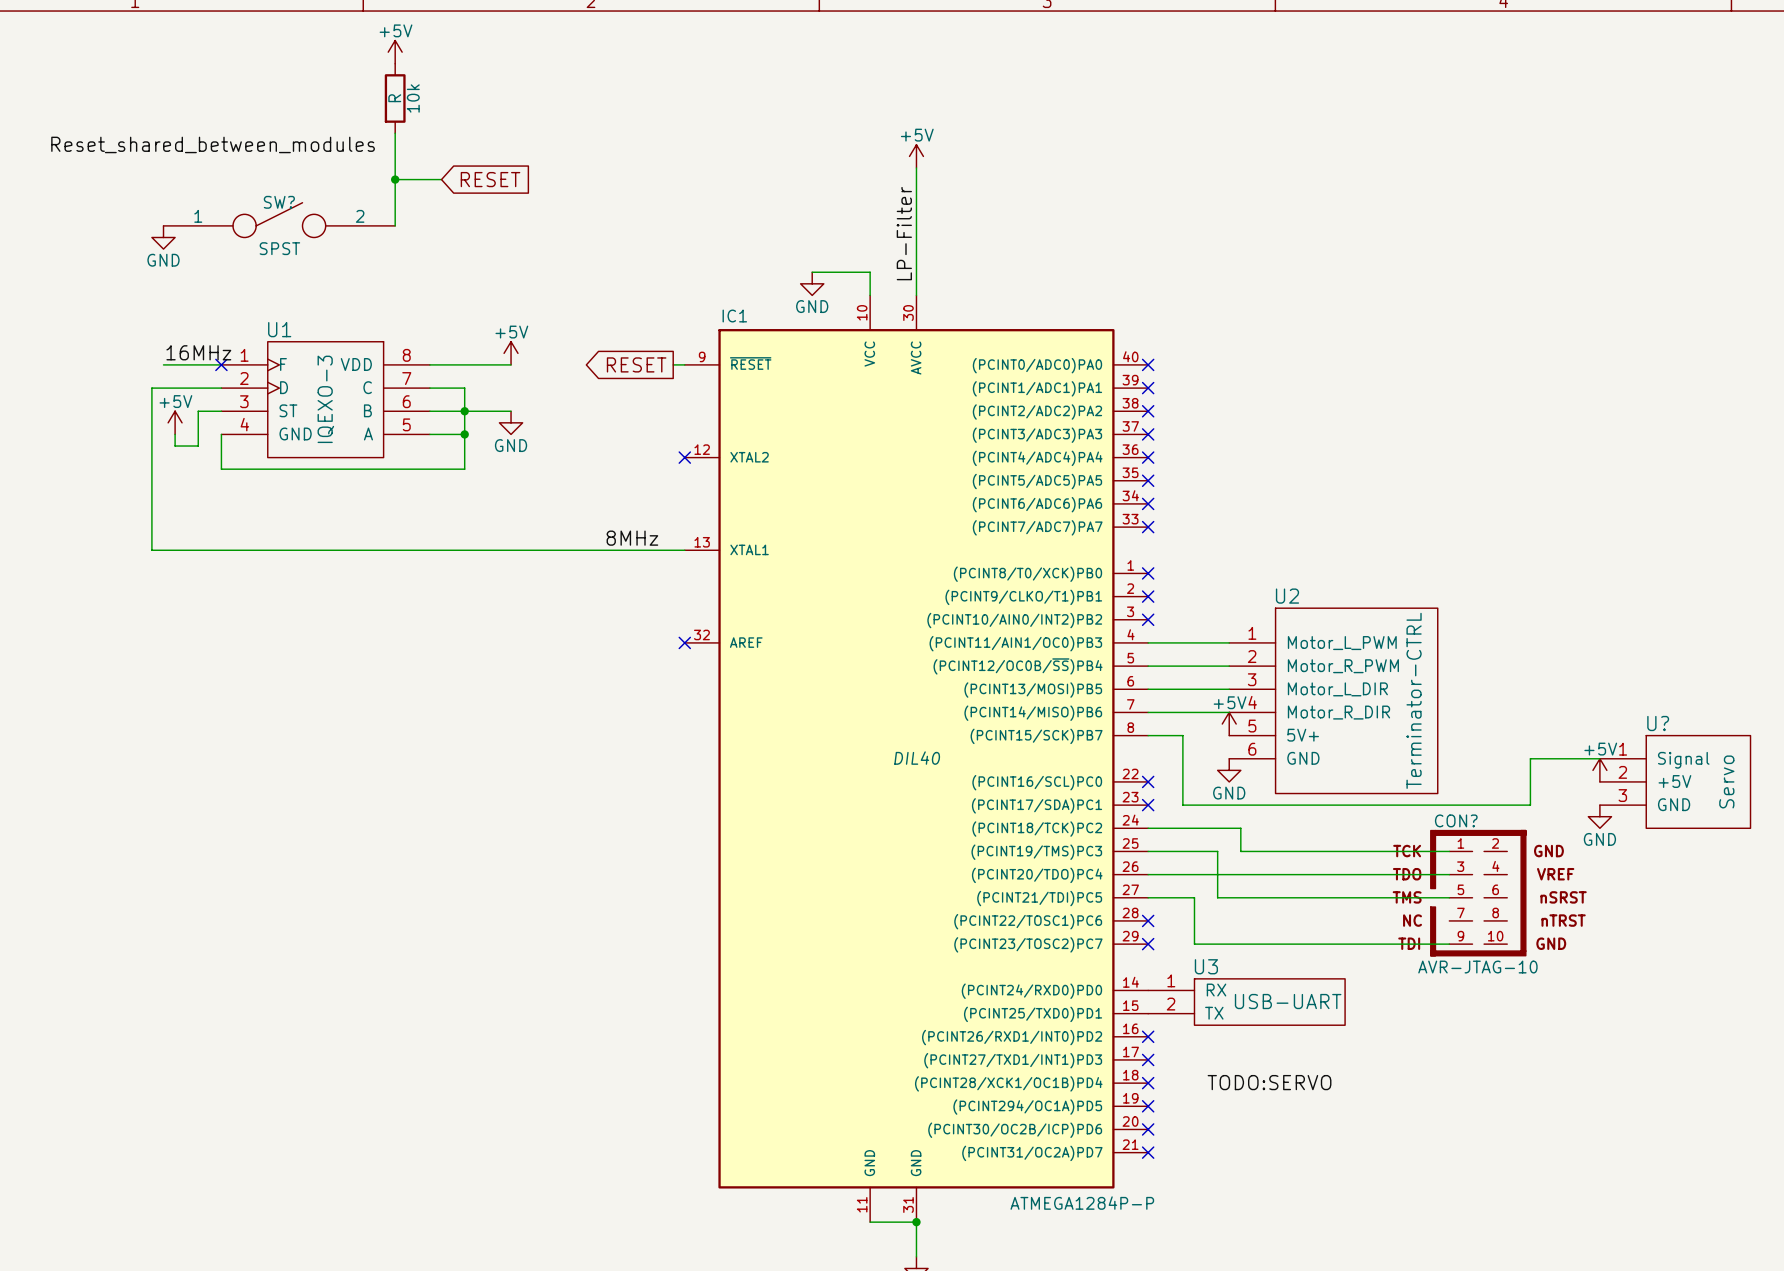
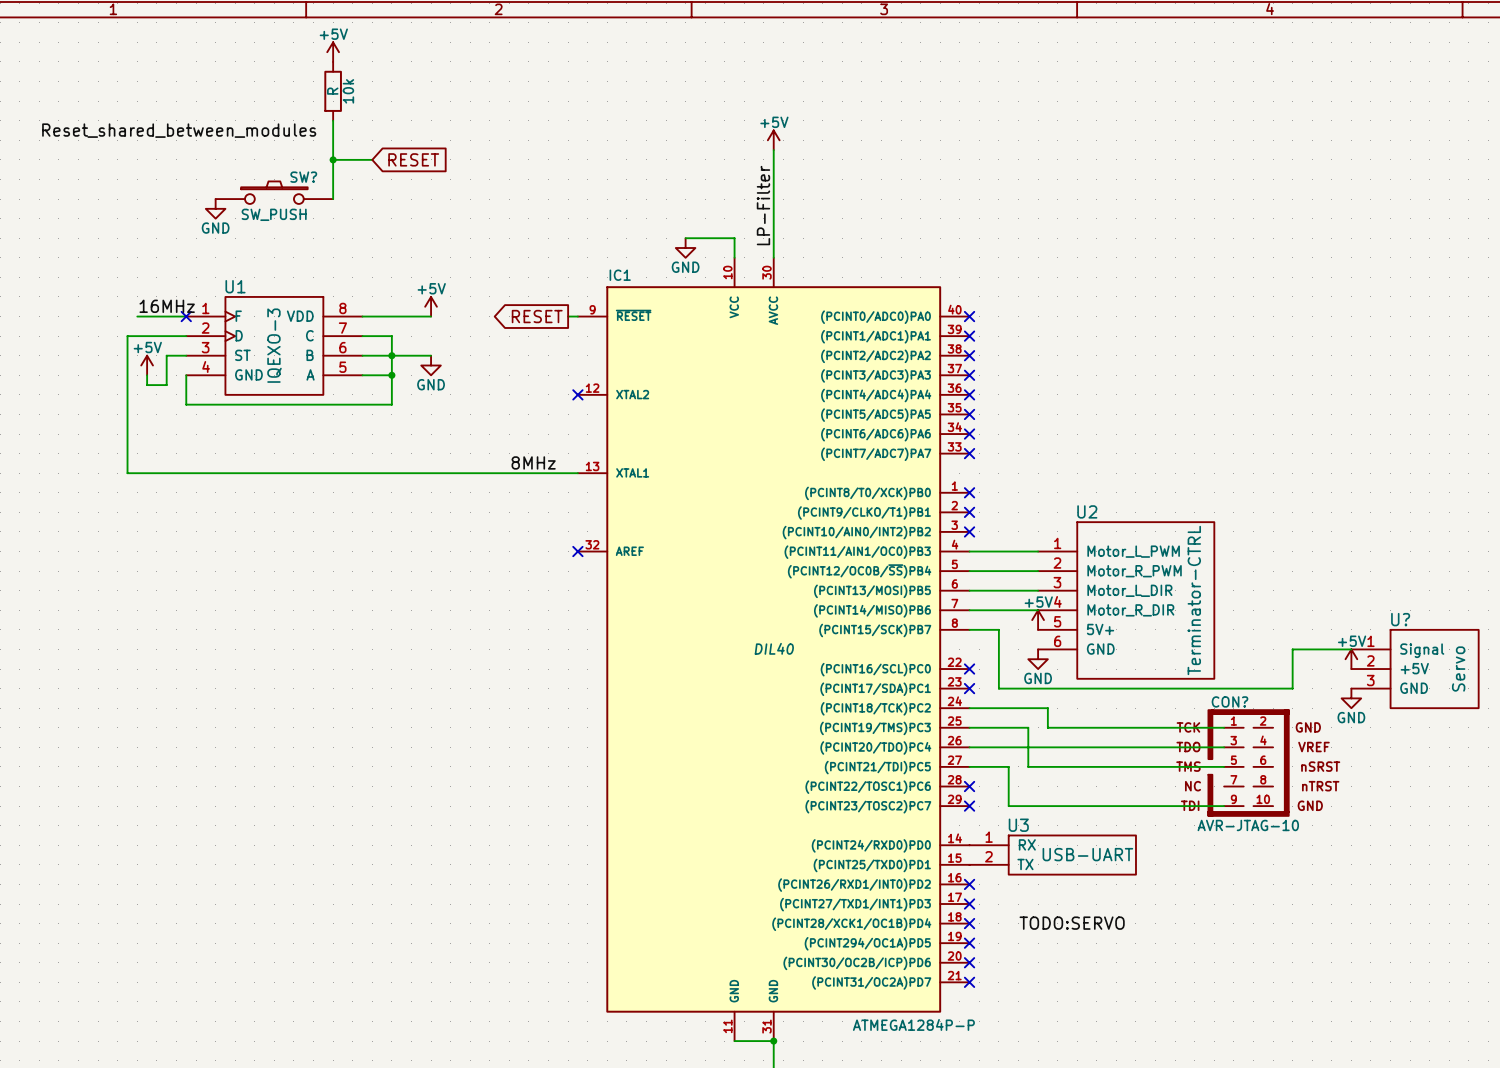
SW?: none -> SW_PUSH (274, 192)
SW?: SPST (279, 220) -> none
power symbol position: GND (163, 237) -> GND (215, 208)

